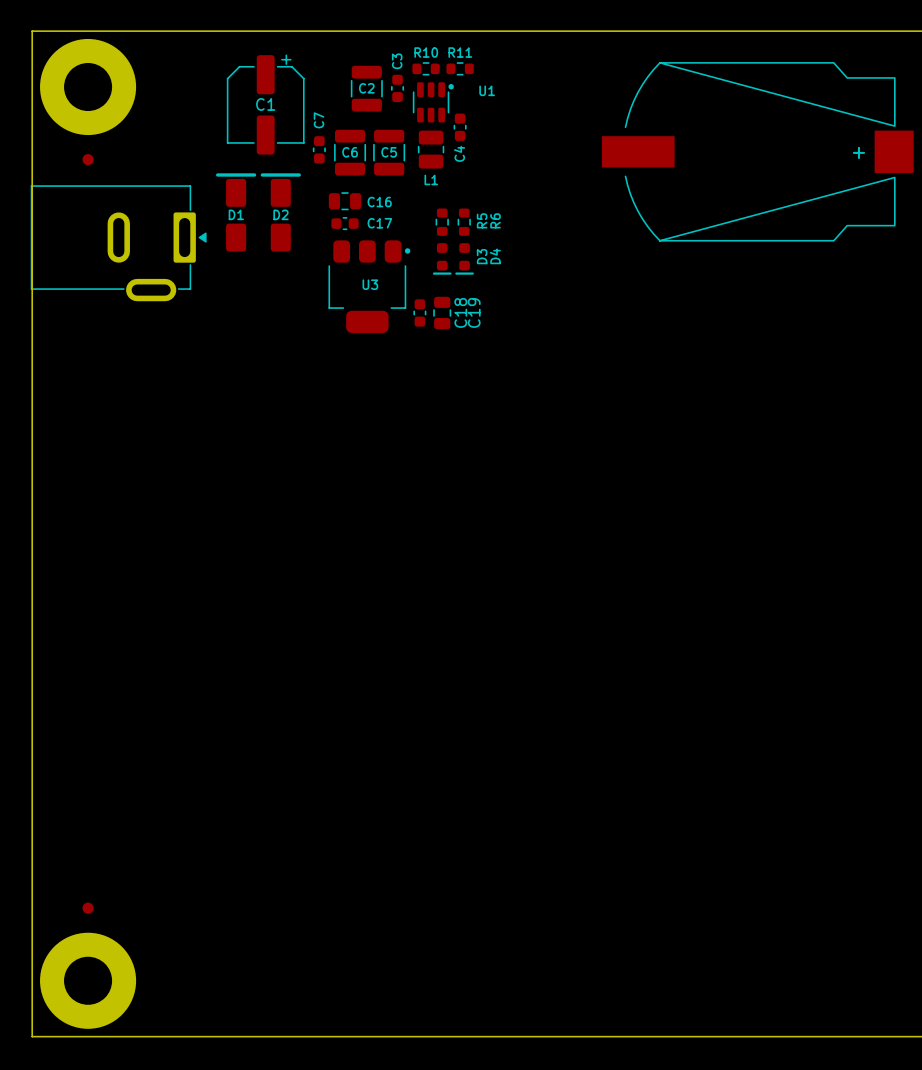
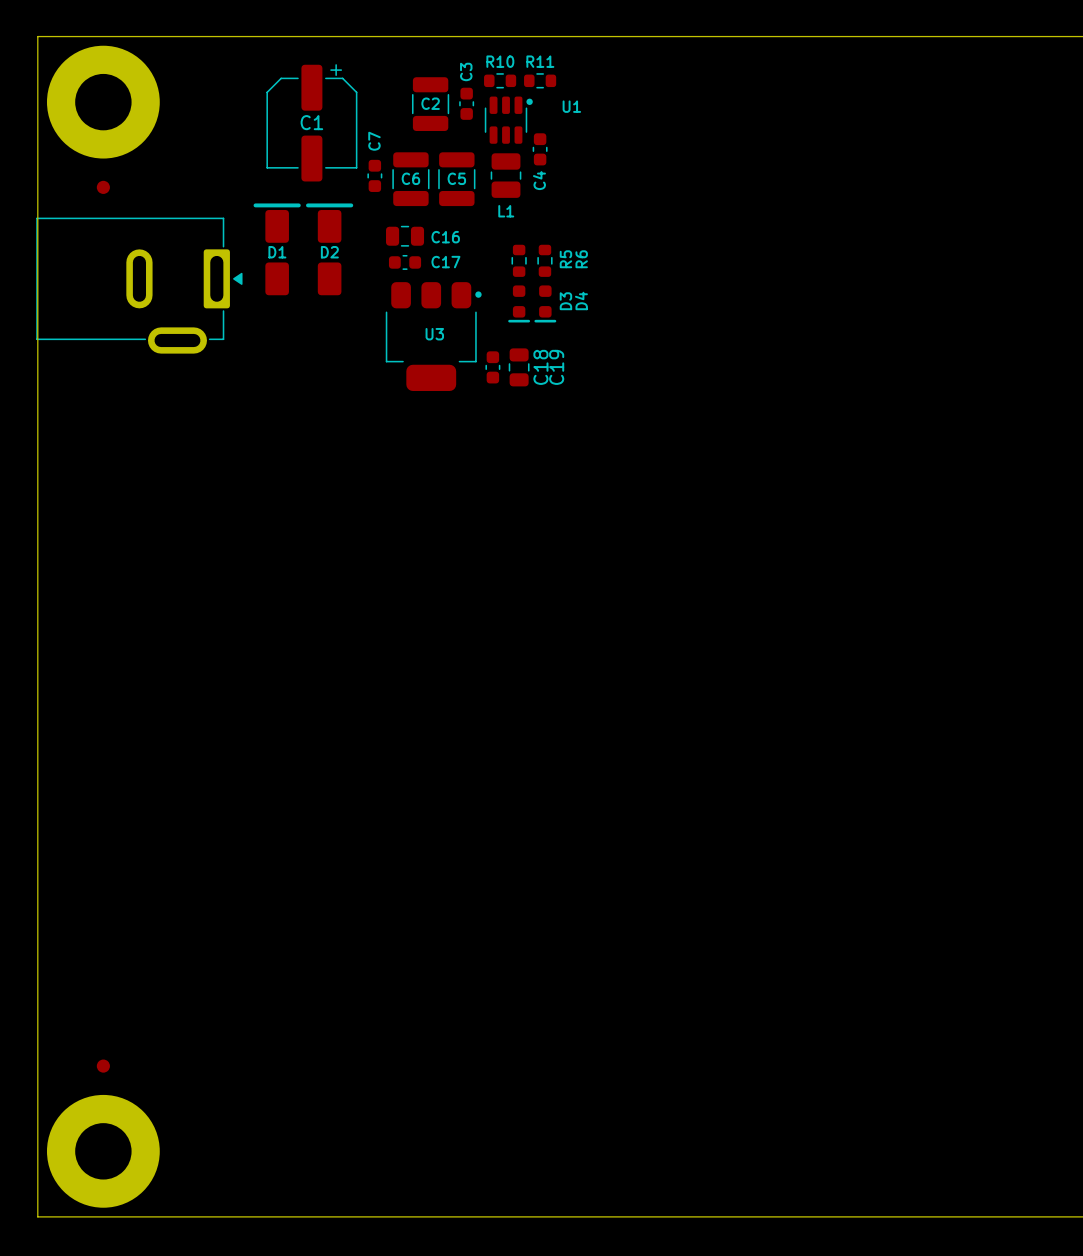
part: (757, 151) -> none

